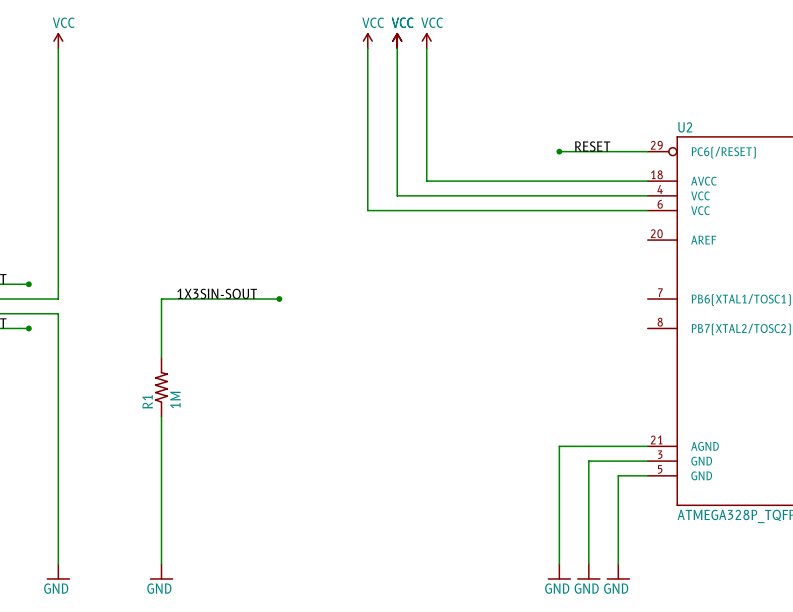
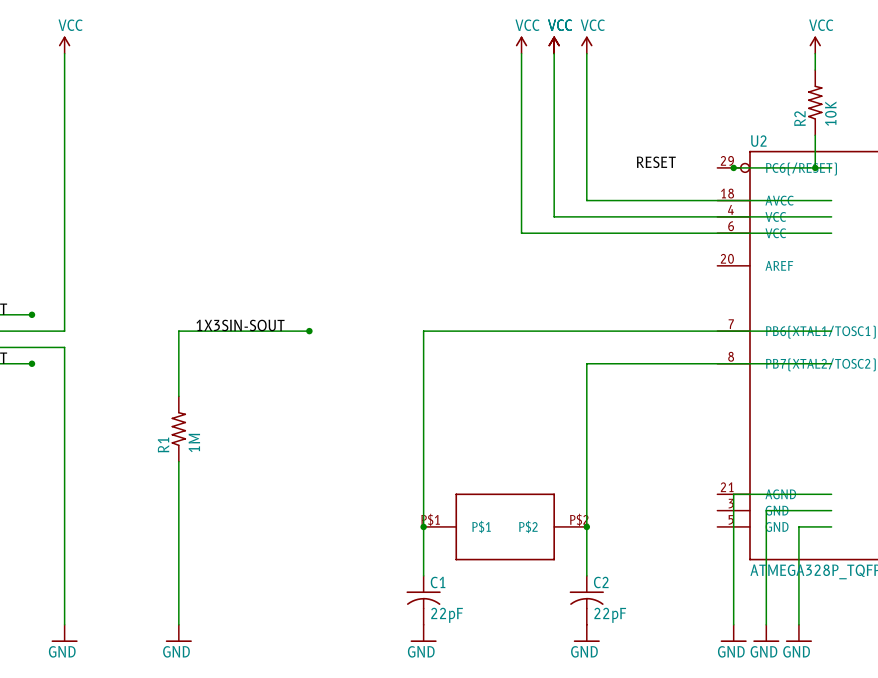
power symbol: VCC (367, 40) -> none
power symbol: VCC (397, 40) -> none
power symbol: VCC (426, 40) -> none
power symbol: none -> VCC (521, 45)
power symbol: none -> VCC (554, 45)
power symbol: none -> VCC (586, 45)
power symbol: none -> VCC (815, 45)
wire: (367, 48) (367, 210) (470, 210) -> (521, 53) (521, 233)
wire: (397, 48) (397, 195) (500, 195) -> (554, 53) (554, 216)
wire: (426, 48) (426, 181) (529, 181) -> (586, 53) (586, 200)
wire: none -> (815, 53) (815, 70)
R2: none -> 10K (815, 102)
wire: none -> (815, 135) (815, 167)
wire: (559, 151) (647, 151) -> (733, 167) (831, 167)
junction: (559, 151) -> none
junction: none -> (733, 167)
junction: none -> (815, 167)
wire: none -> (717, 200) (831, 200)
wire: none -> (717, 216) (831, 216)
wire: none -> (717, 233) (831, 233)
wire: none -> (831, 331) (423, 331) (423, 575)
wire: none -> (831, 363) (586, 363) (586, 575)
wire: (647, 446) (559, 446) (559, 564) -> (831, 494) (733, 494) (733, 624)
wire: (647, 461) (588, 461) (588, 564) -> (831, 510) (766, 510) (766, 624)
junction: none -> (423, 526)
part: none -> (505, 526)
junction: none -> (586, 526)
wire: (647, 475) (618, 475) (618, 564) -> (831, 526) (798, 526) (798, 624)
C1: none -> 22pF (423, 600)
C2: none -> 22pF (586, 600)
power symbol: none -> GND (423, 633)
power symbol: none -> GND (586, 633)
power symbol: GND (559, 571) -> none
power symbol: GND (588, 571) -> none
power symbol: GND (618, 571) -> none
power symbol: none -> GND (733, 633)
power symbol: none -> GND (766, 633)
power symbol: none -> GND (798, 633)

